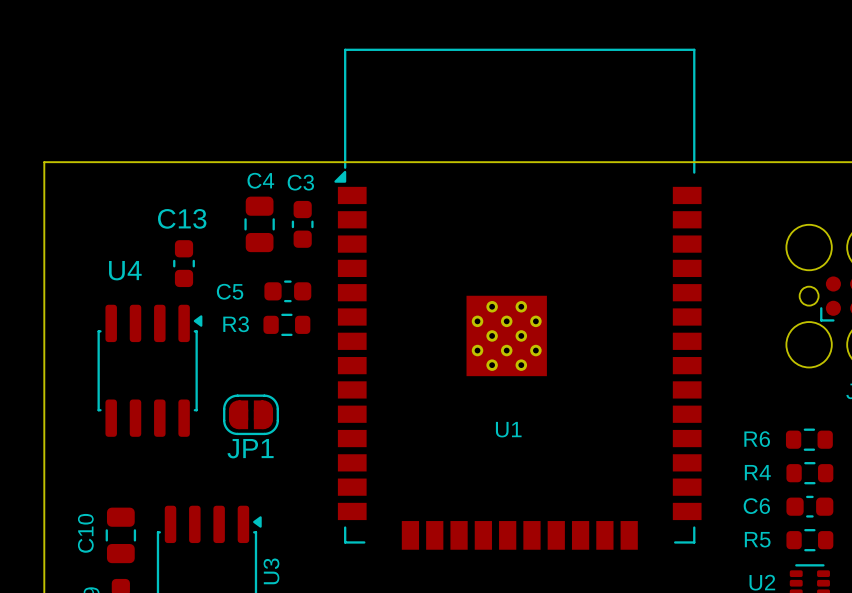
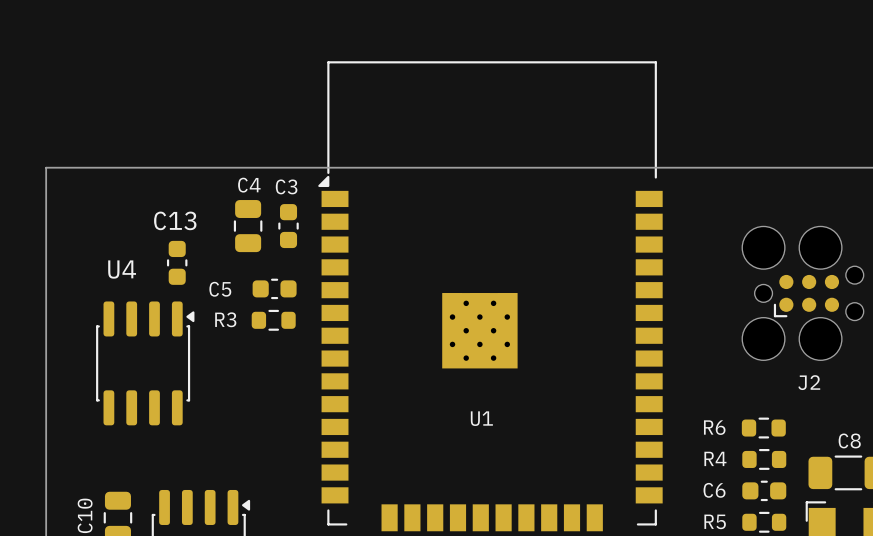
JP1: (251, 414) -> none

